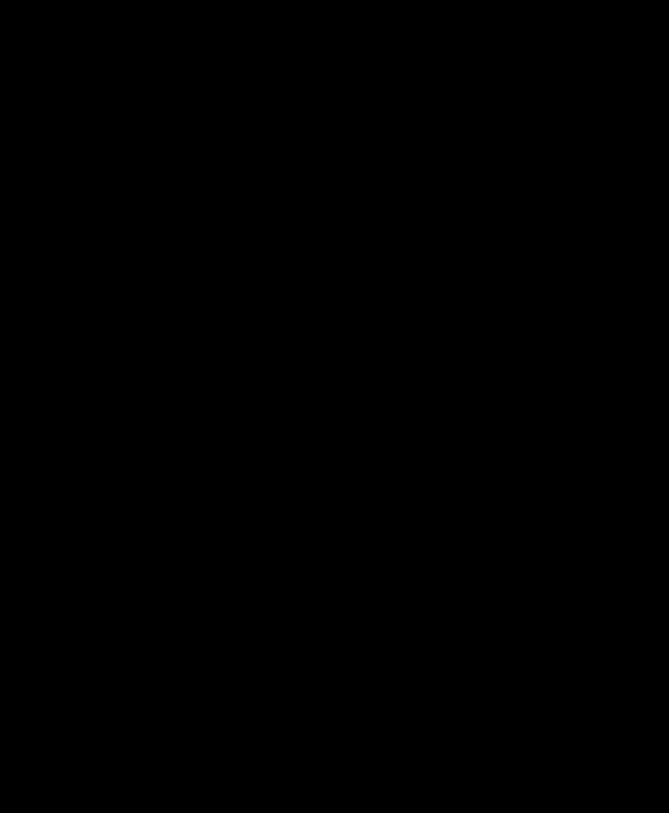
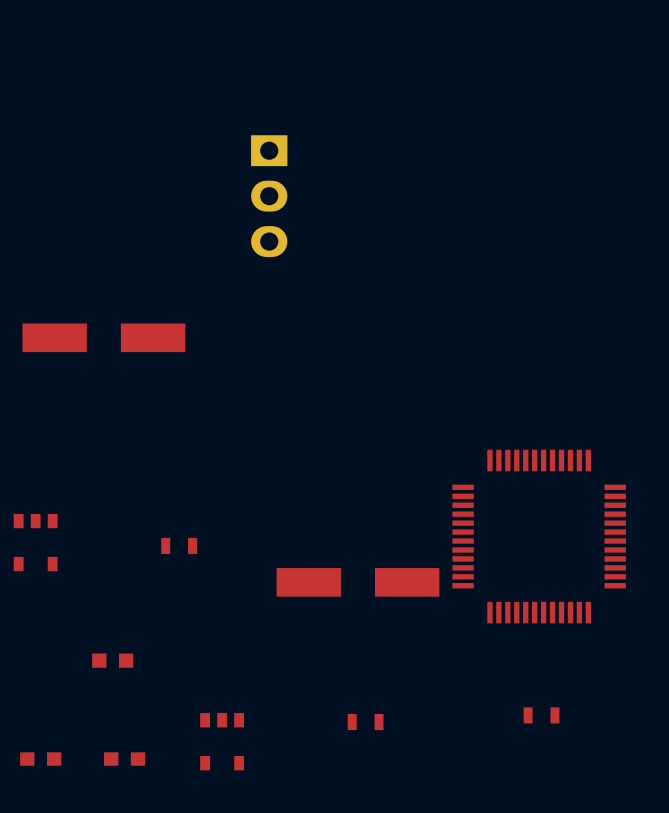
part: none -> (269, 196)
part: none -> (103, 337)
part: none -> (539, 536)
part: none -> (35, 542)
part: none -> (179, 545)
part: none -> (357, 582)
part: none -> (112, 660)
part: none -> (541, 715)
part: none -> (365, 722)
part: none -> (222, 741)
part: none -> (40, 759)
part: none -> (124, 759)

